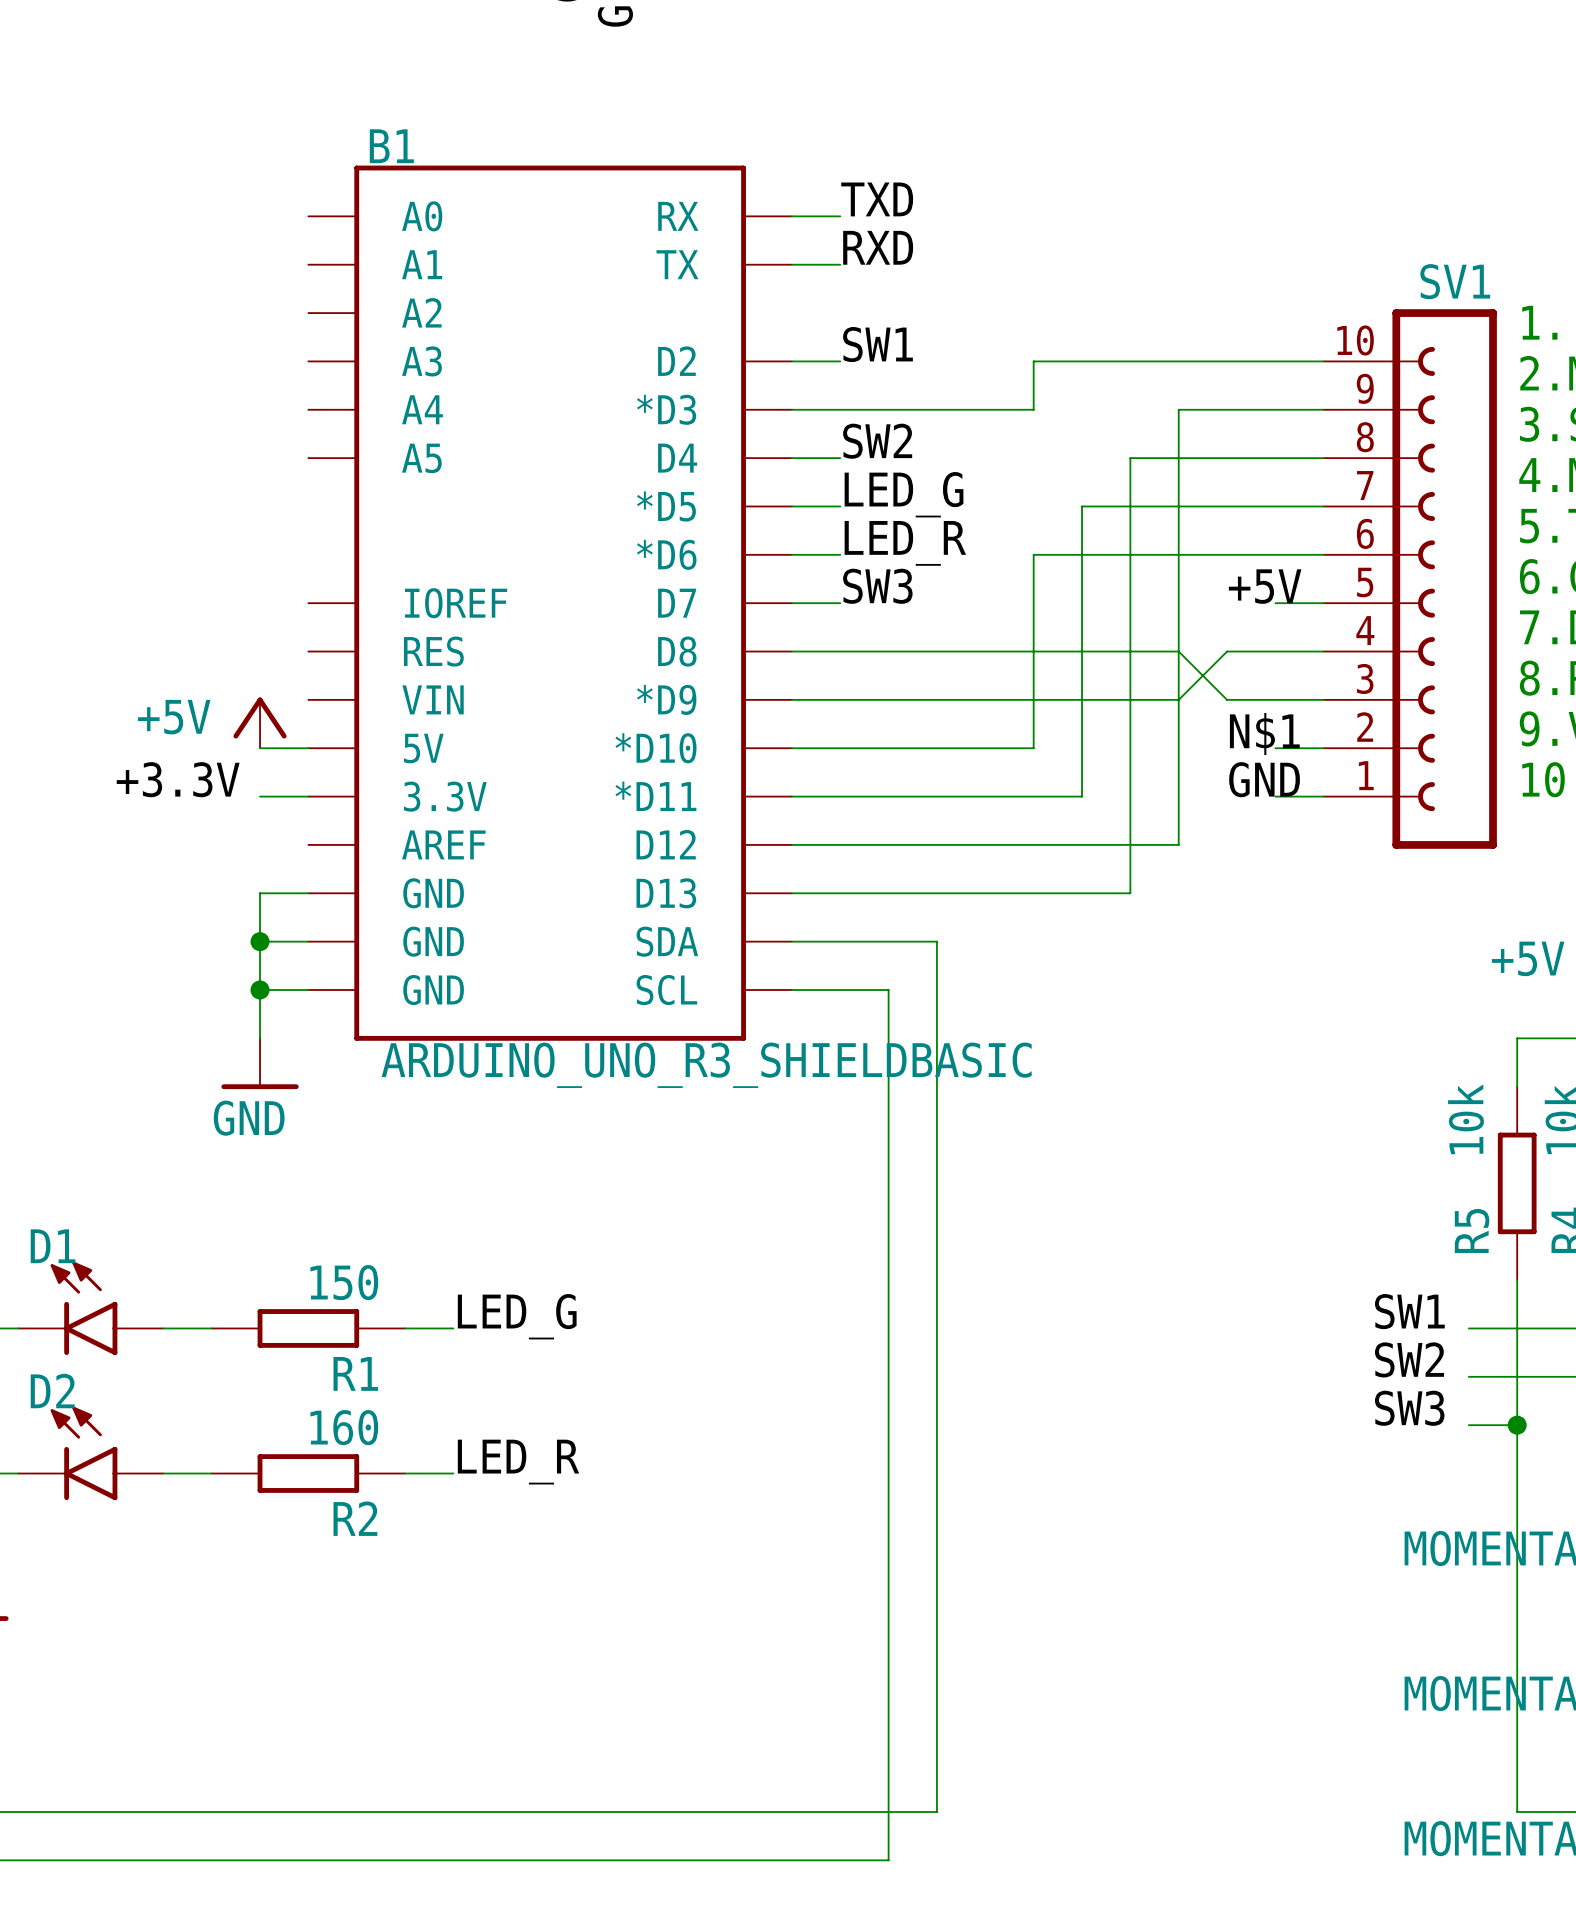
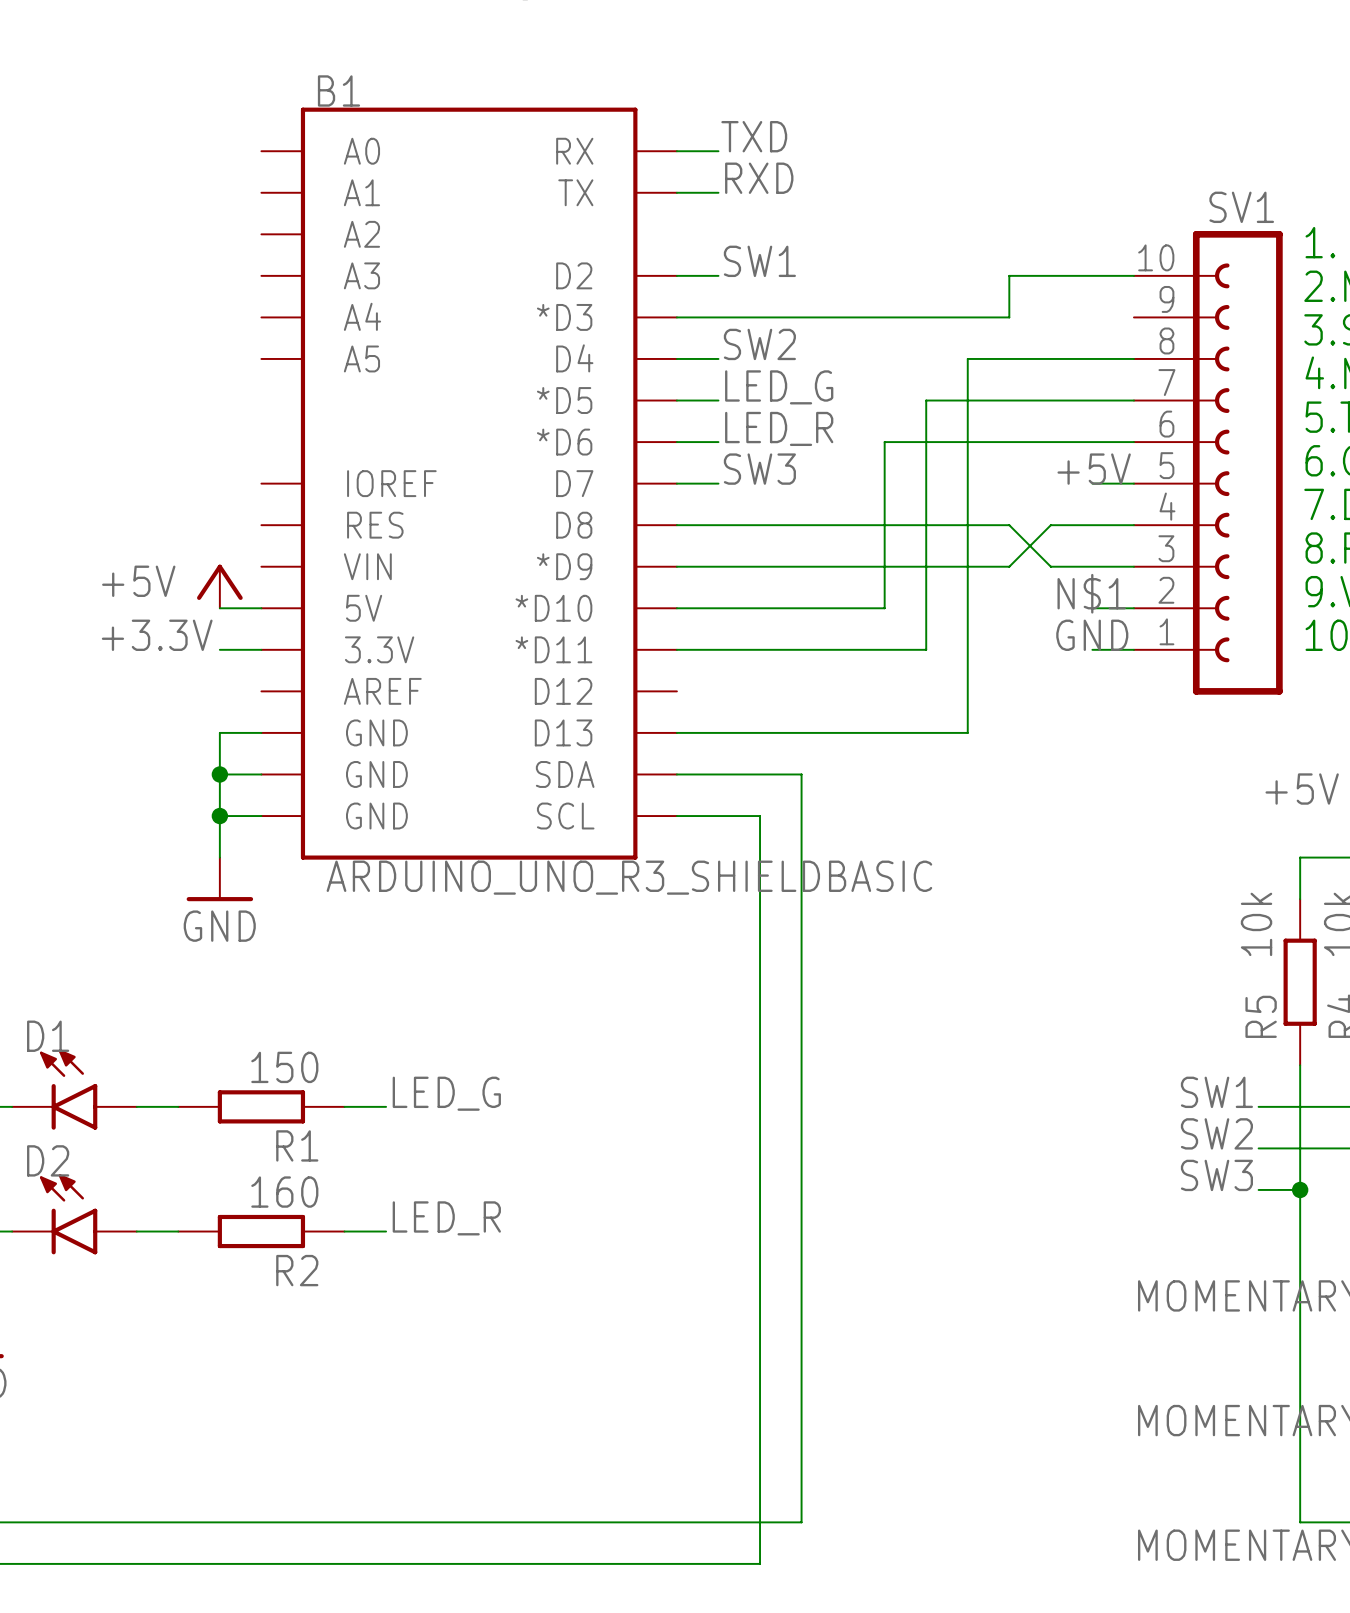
wire: (1178, 361) (1033, 361) (1033, 409) -> (1009, 275) (1009, 317) (884, 317)
wire: (1323, 409) (1178, 409) (1178, 844) (791, 844) -> none

